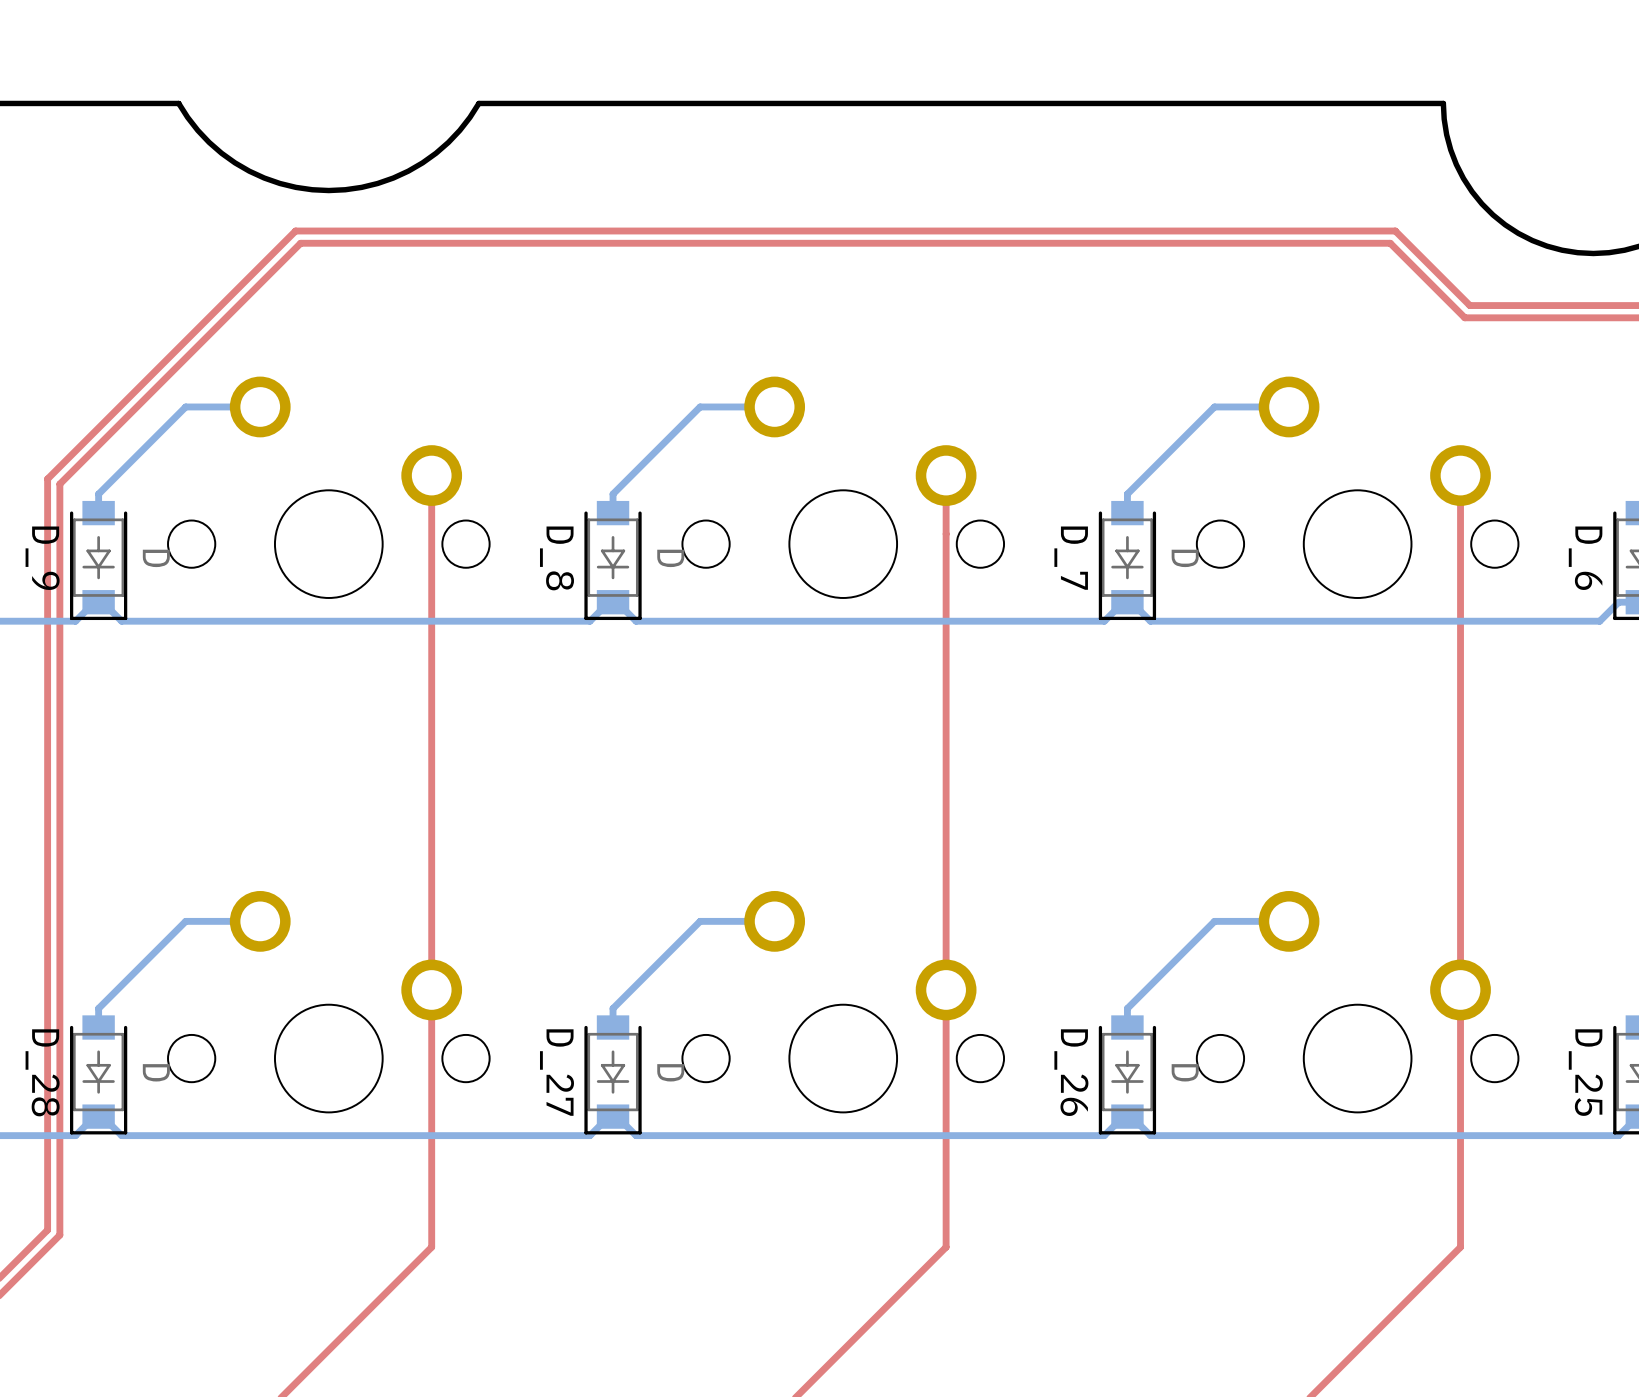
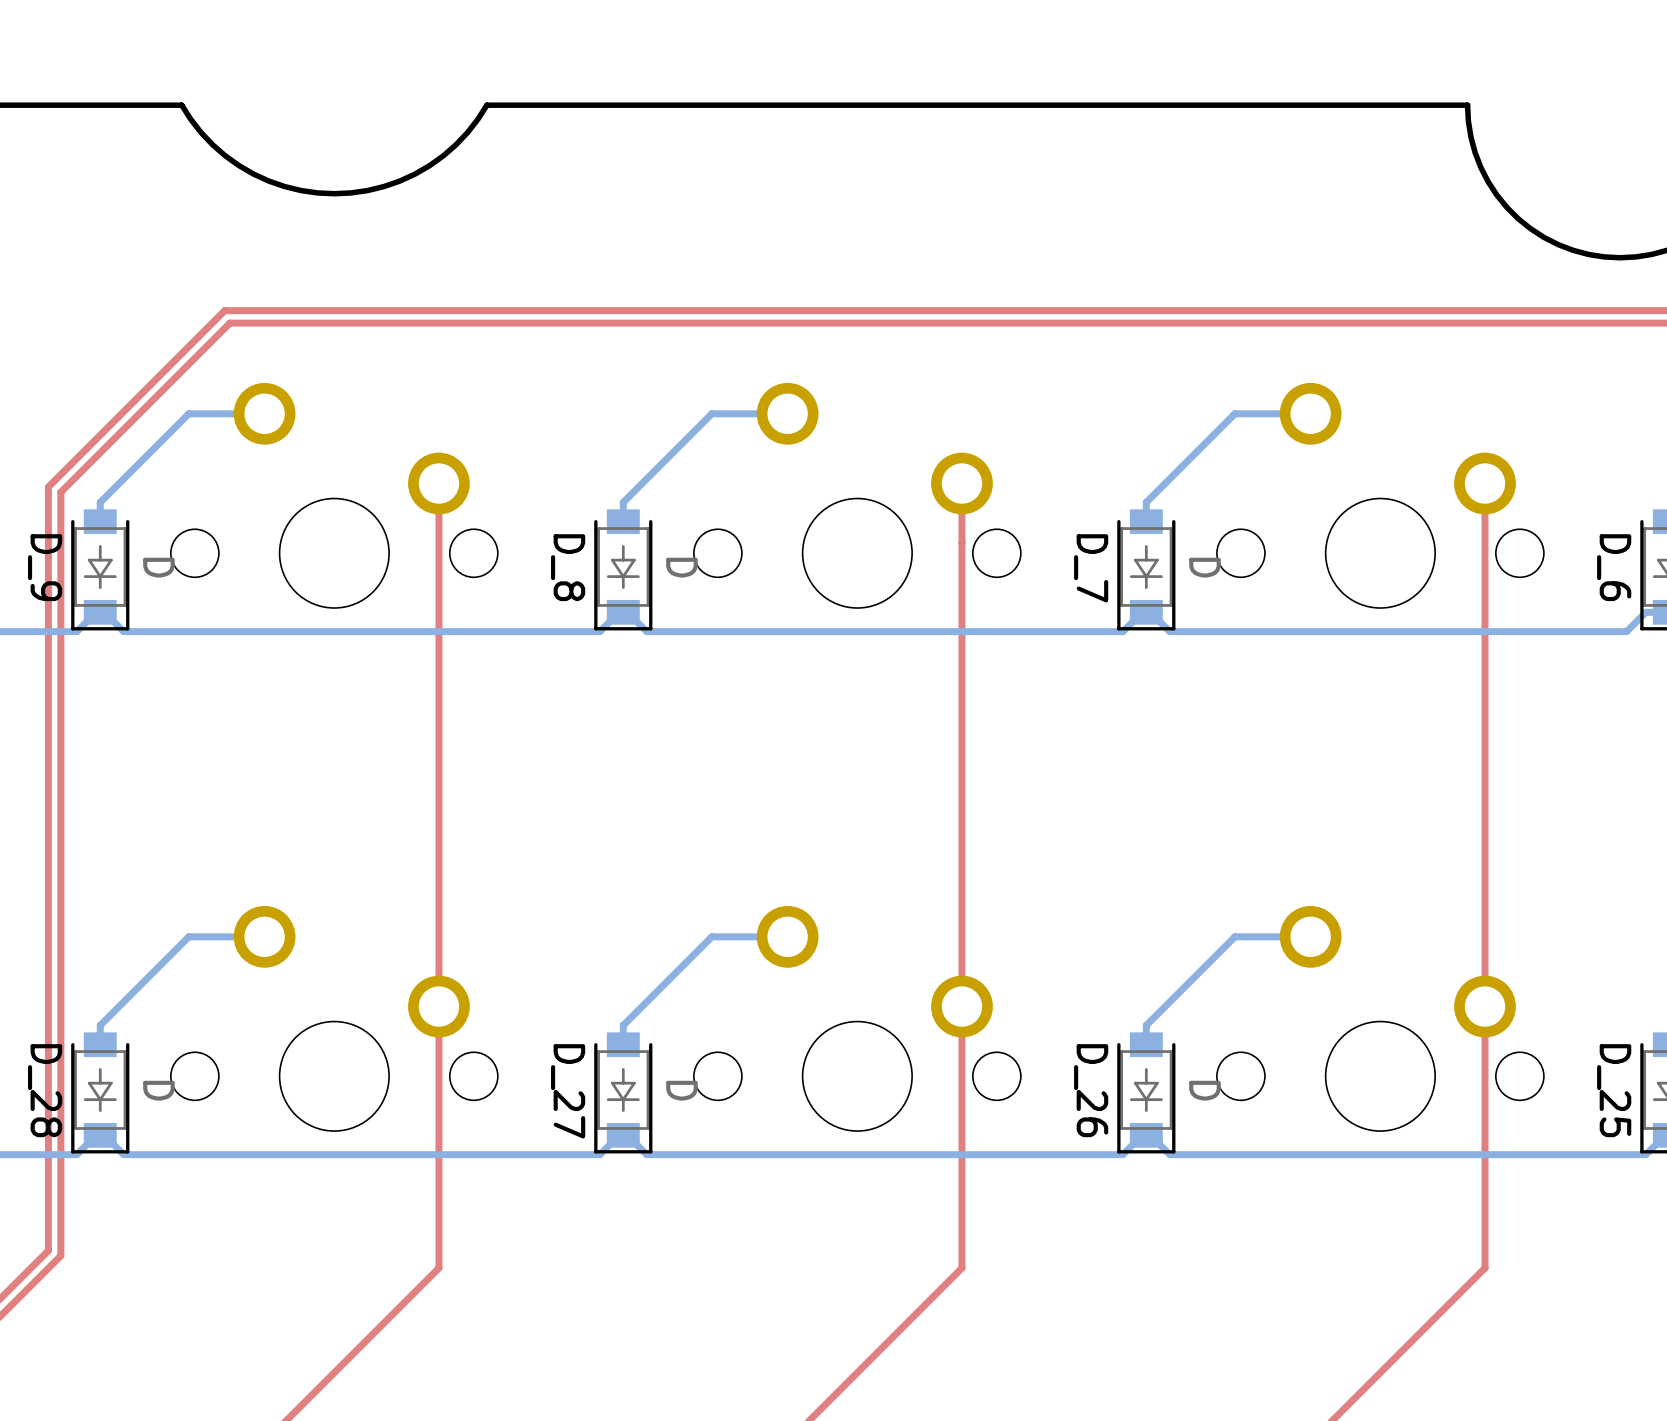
top track: (1469, 305) (1395, 231) (295, 231) (221, 305) -> (1494, 310) (224, 310)
top track: (1464, 317) (1390, 243) (300, 243) (226, 317) -> (1489, 323) (229, 323)

